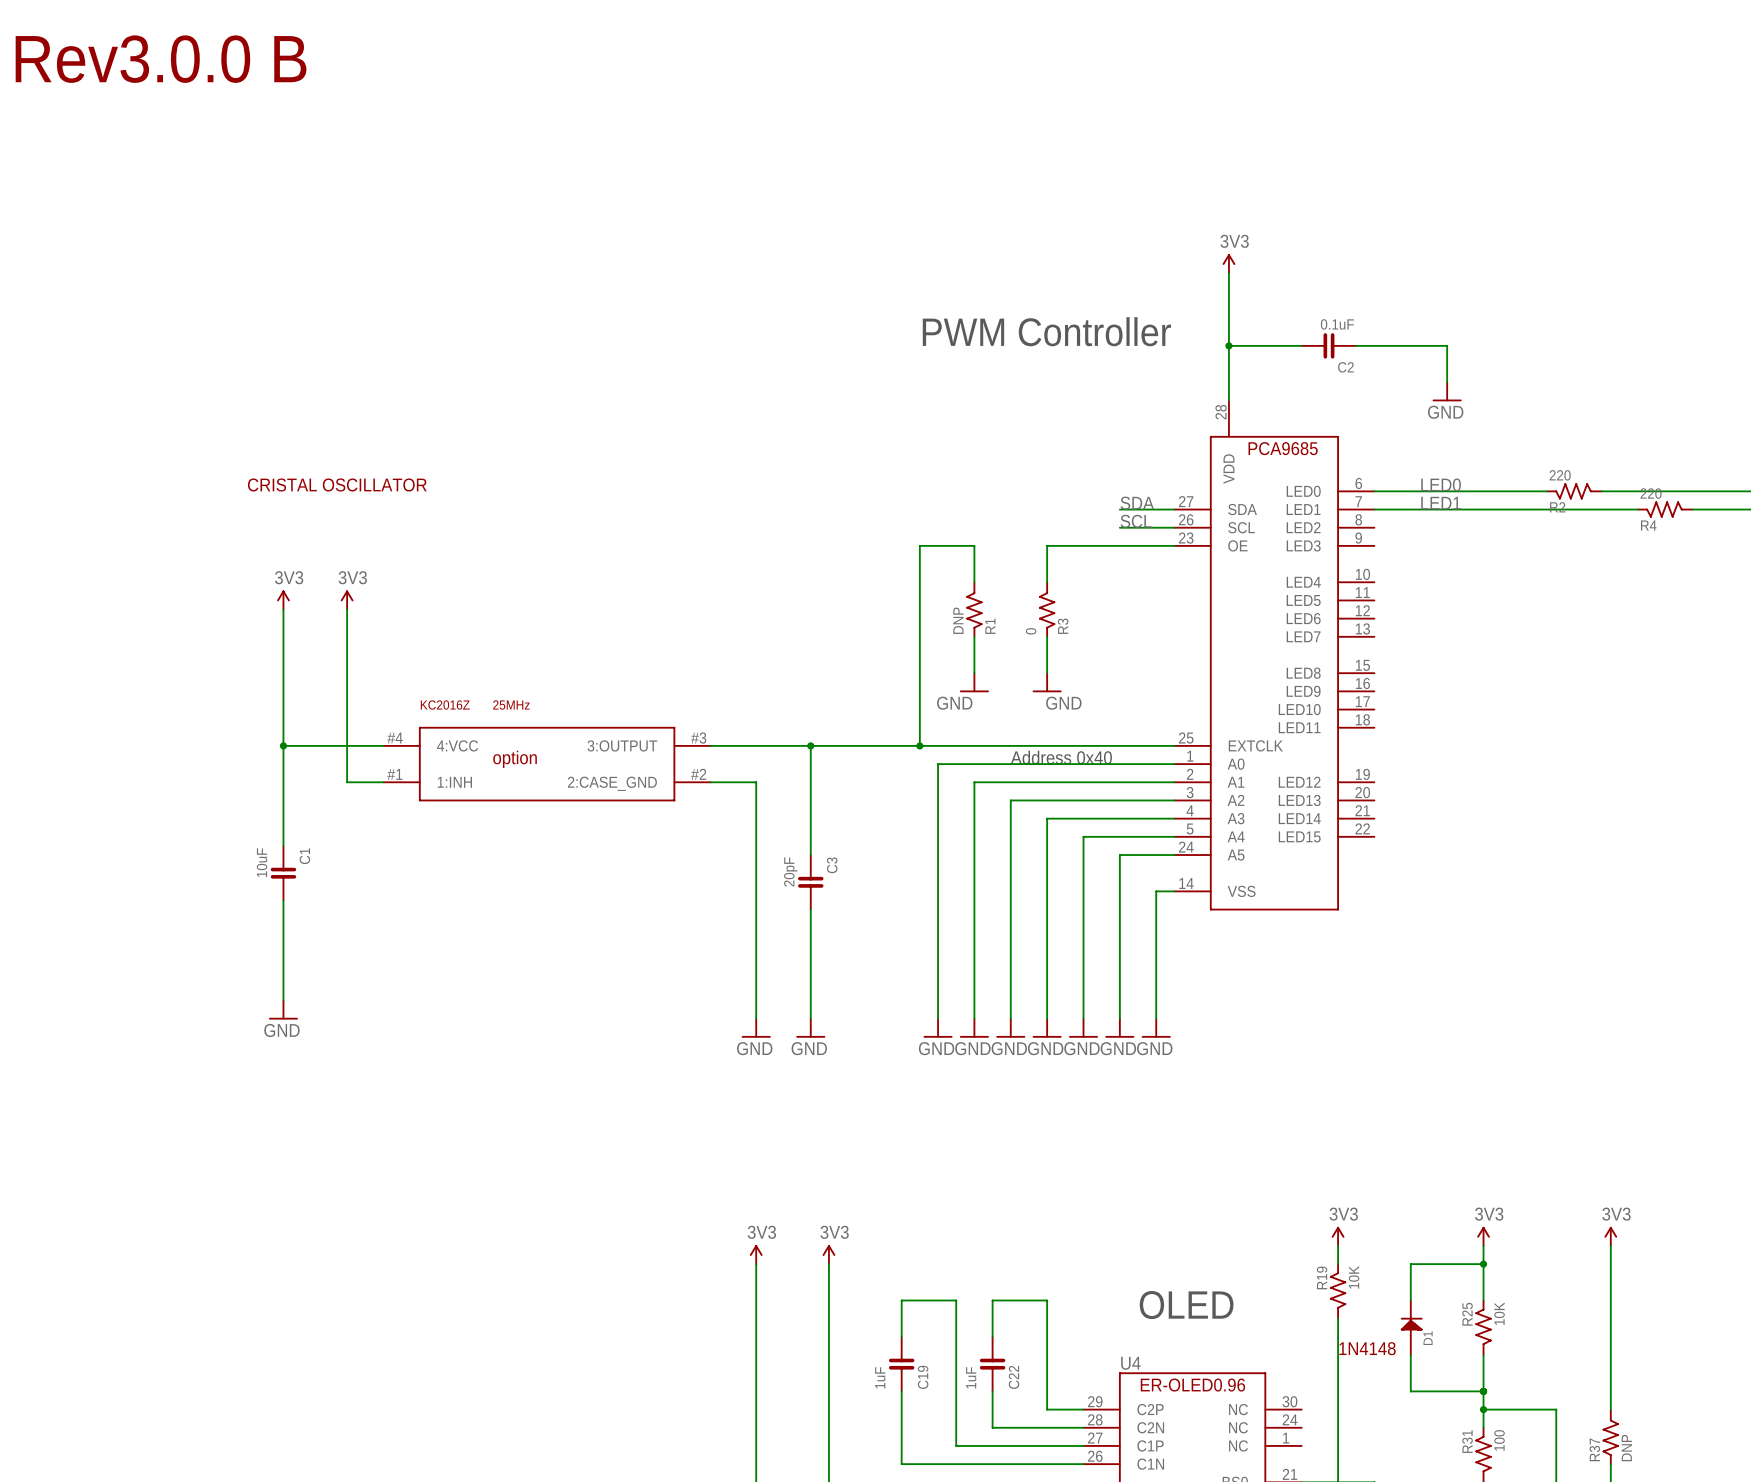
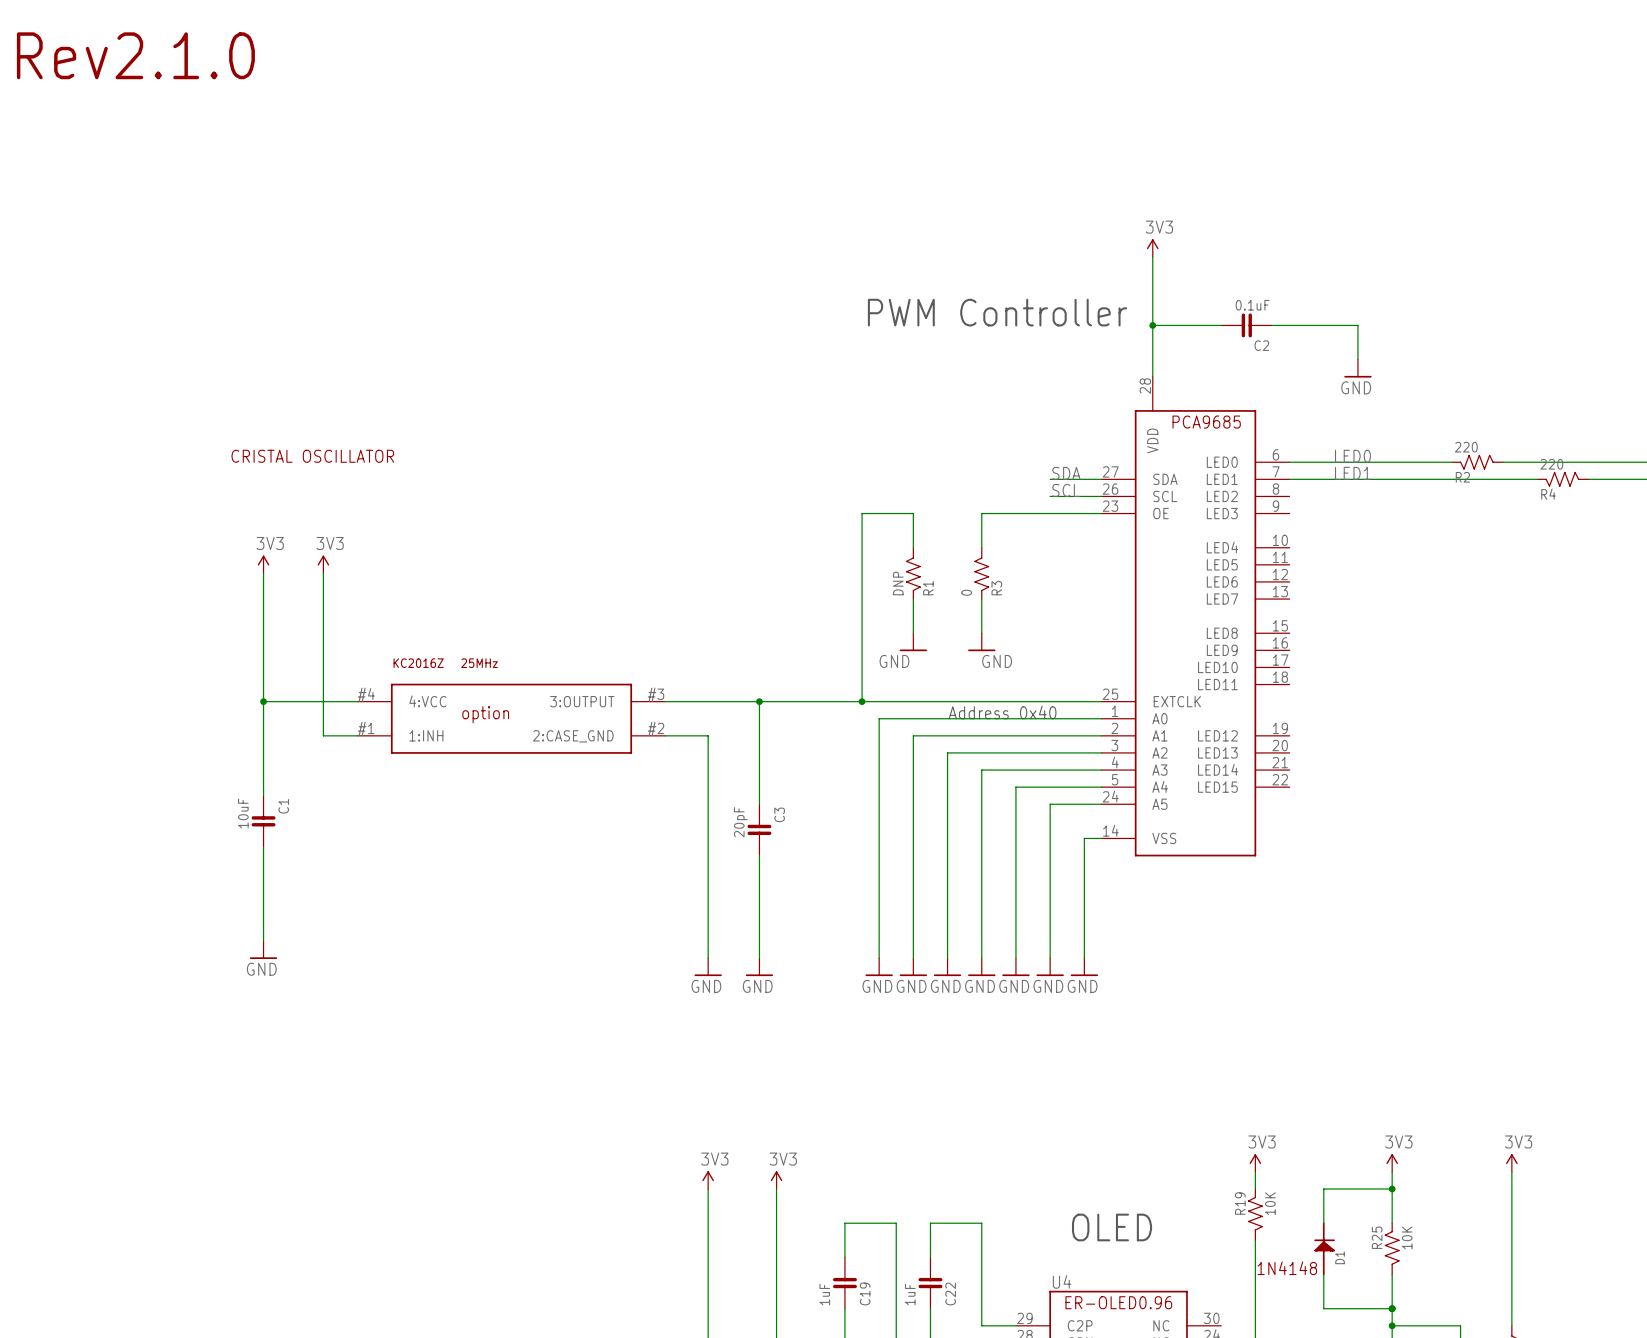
text: Rev3.0.0 B (161, 59) -> Rev2.1.0 (135, 55)

